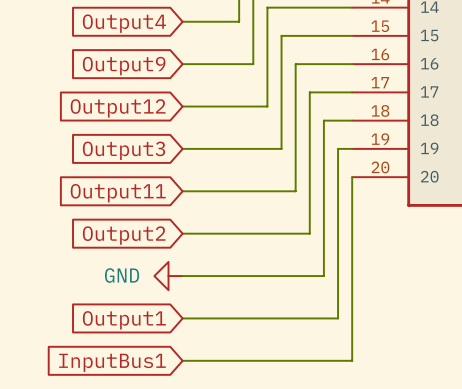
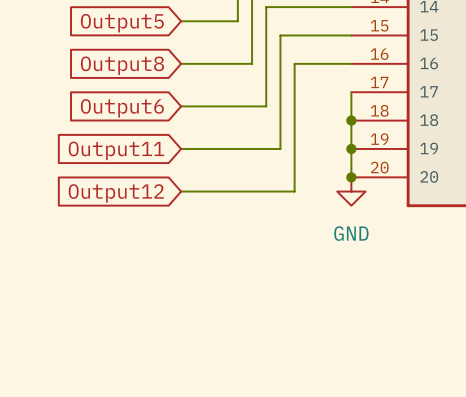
global label: Output4 (124, 23) -> Output5 (122, 23)
global label: Output9 (124, 66) -> Output8 (122, 65)
wire: (352, 92) (309, 92) (309, 233) (182, 233) -> (351, 92) (351, 177)
global label: Output12 (118, 108) -> Output6 (122, 108)
wire: (352, 120) (323, 120) (323, 276) (182, 276) -> none
junction: none -> (351, 120)
wire: (352, 148) (338, 148) (338, 318) (182, 318) -> none
junction: none -> (351, 148)
global label: Output3 (123, 150) -> Output11 (116, 150)
wire: (352, 177) (352, 360) (182, 360) -> none
junction: none -> (351, 177)
global label: Output11 (118, 193) -> Output12 (116, 193)
global label: Output2 (124, 235) -> none
power symbol rotation: 0° (168, 276) -> 90° counterclockwise (351, 191)
power symbol position: GND (168, 276) -> GND (351, 191)
global label: Output1 (124, 320) -> none
global label: InputBus1 (112, 362) -> none

